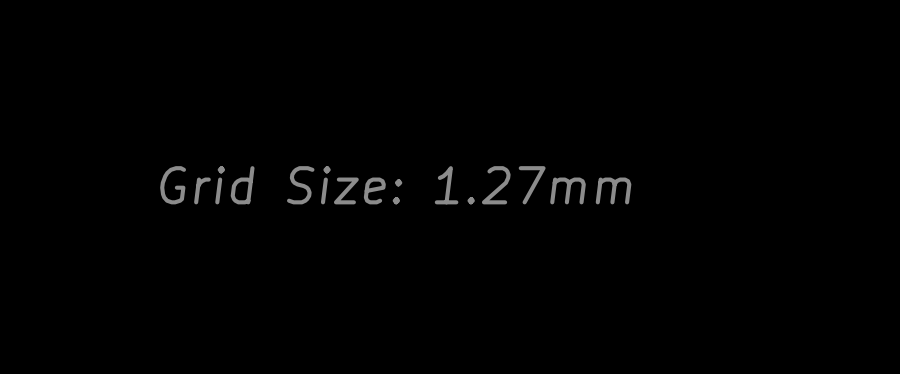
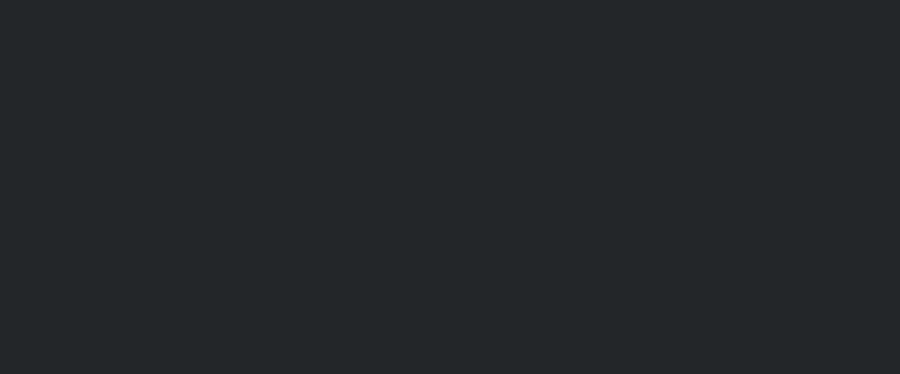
text: Grid Size: 1.27mm (395, 185) -> none

